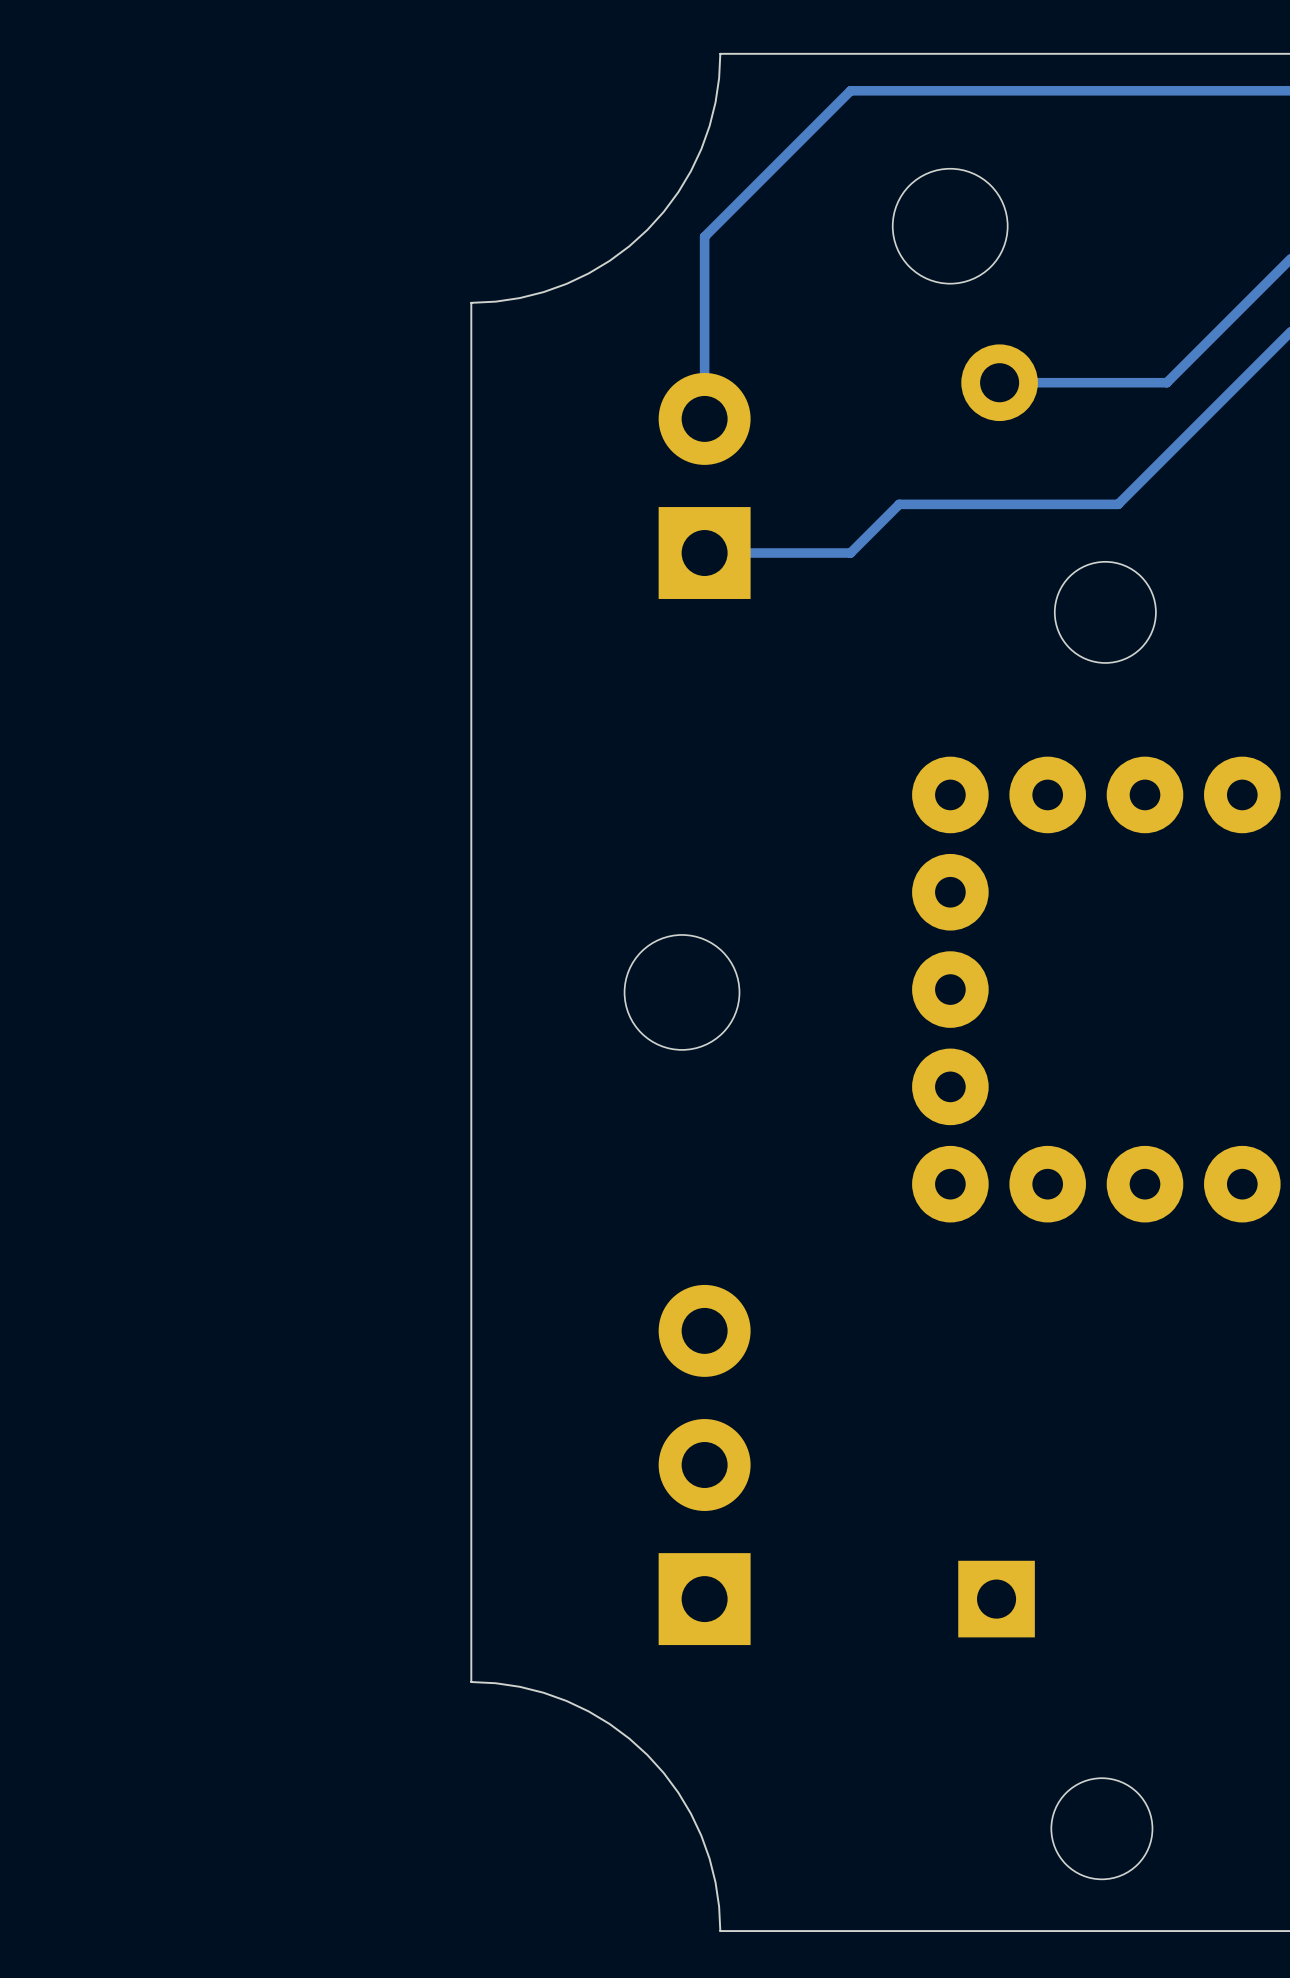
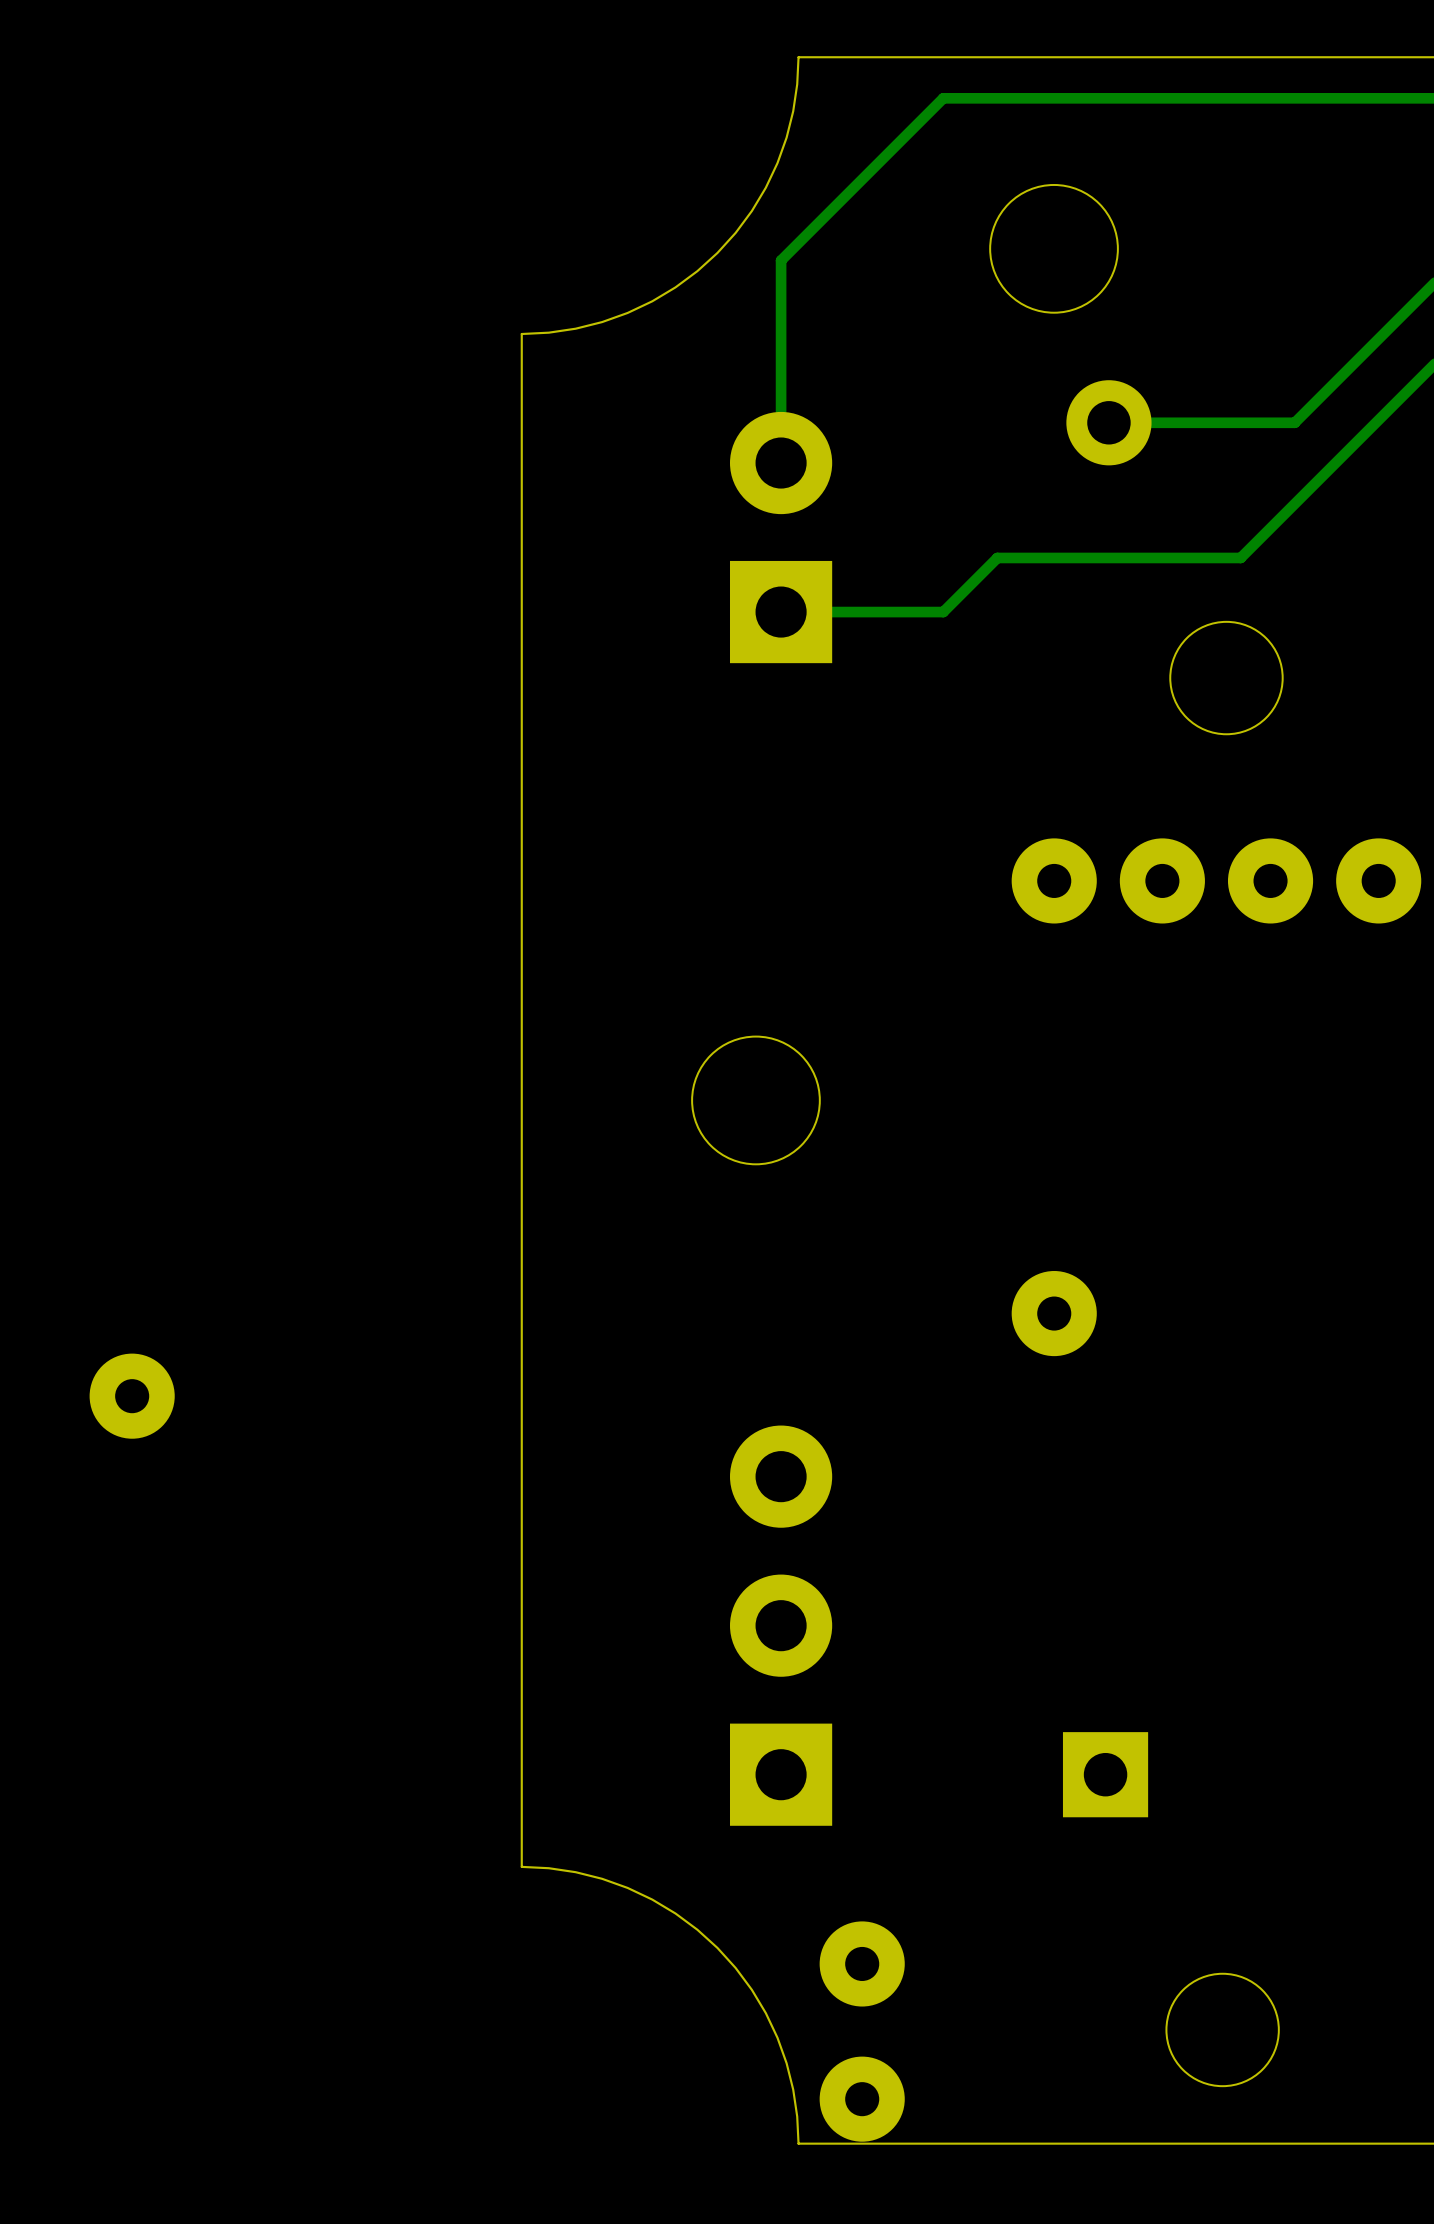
part: (950, 892) -> none
part: (950, 989) -> none
part: (950, 1086) -> none
part: (1047, 1184) -> none
part: (1145, 1184) -> none
part: (1242, 1184) -> none
part: none -> (132, 1396)
part: none -> (862, 1963)
part: none -> (862, 2099)

